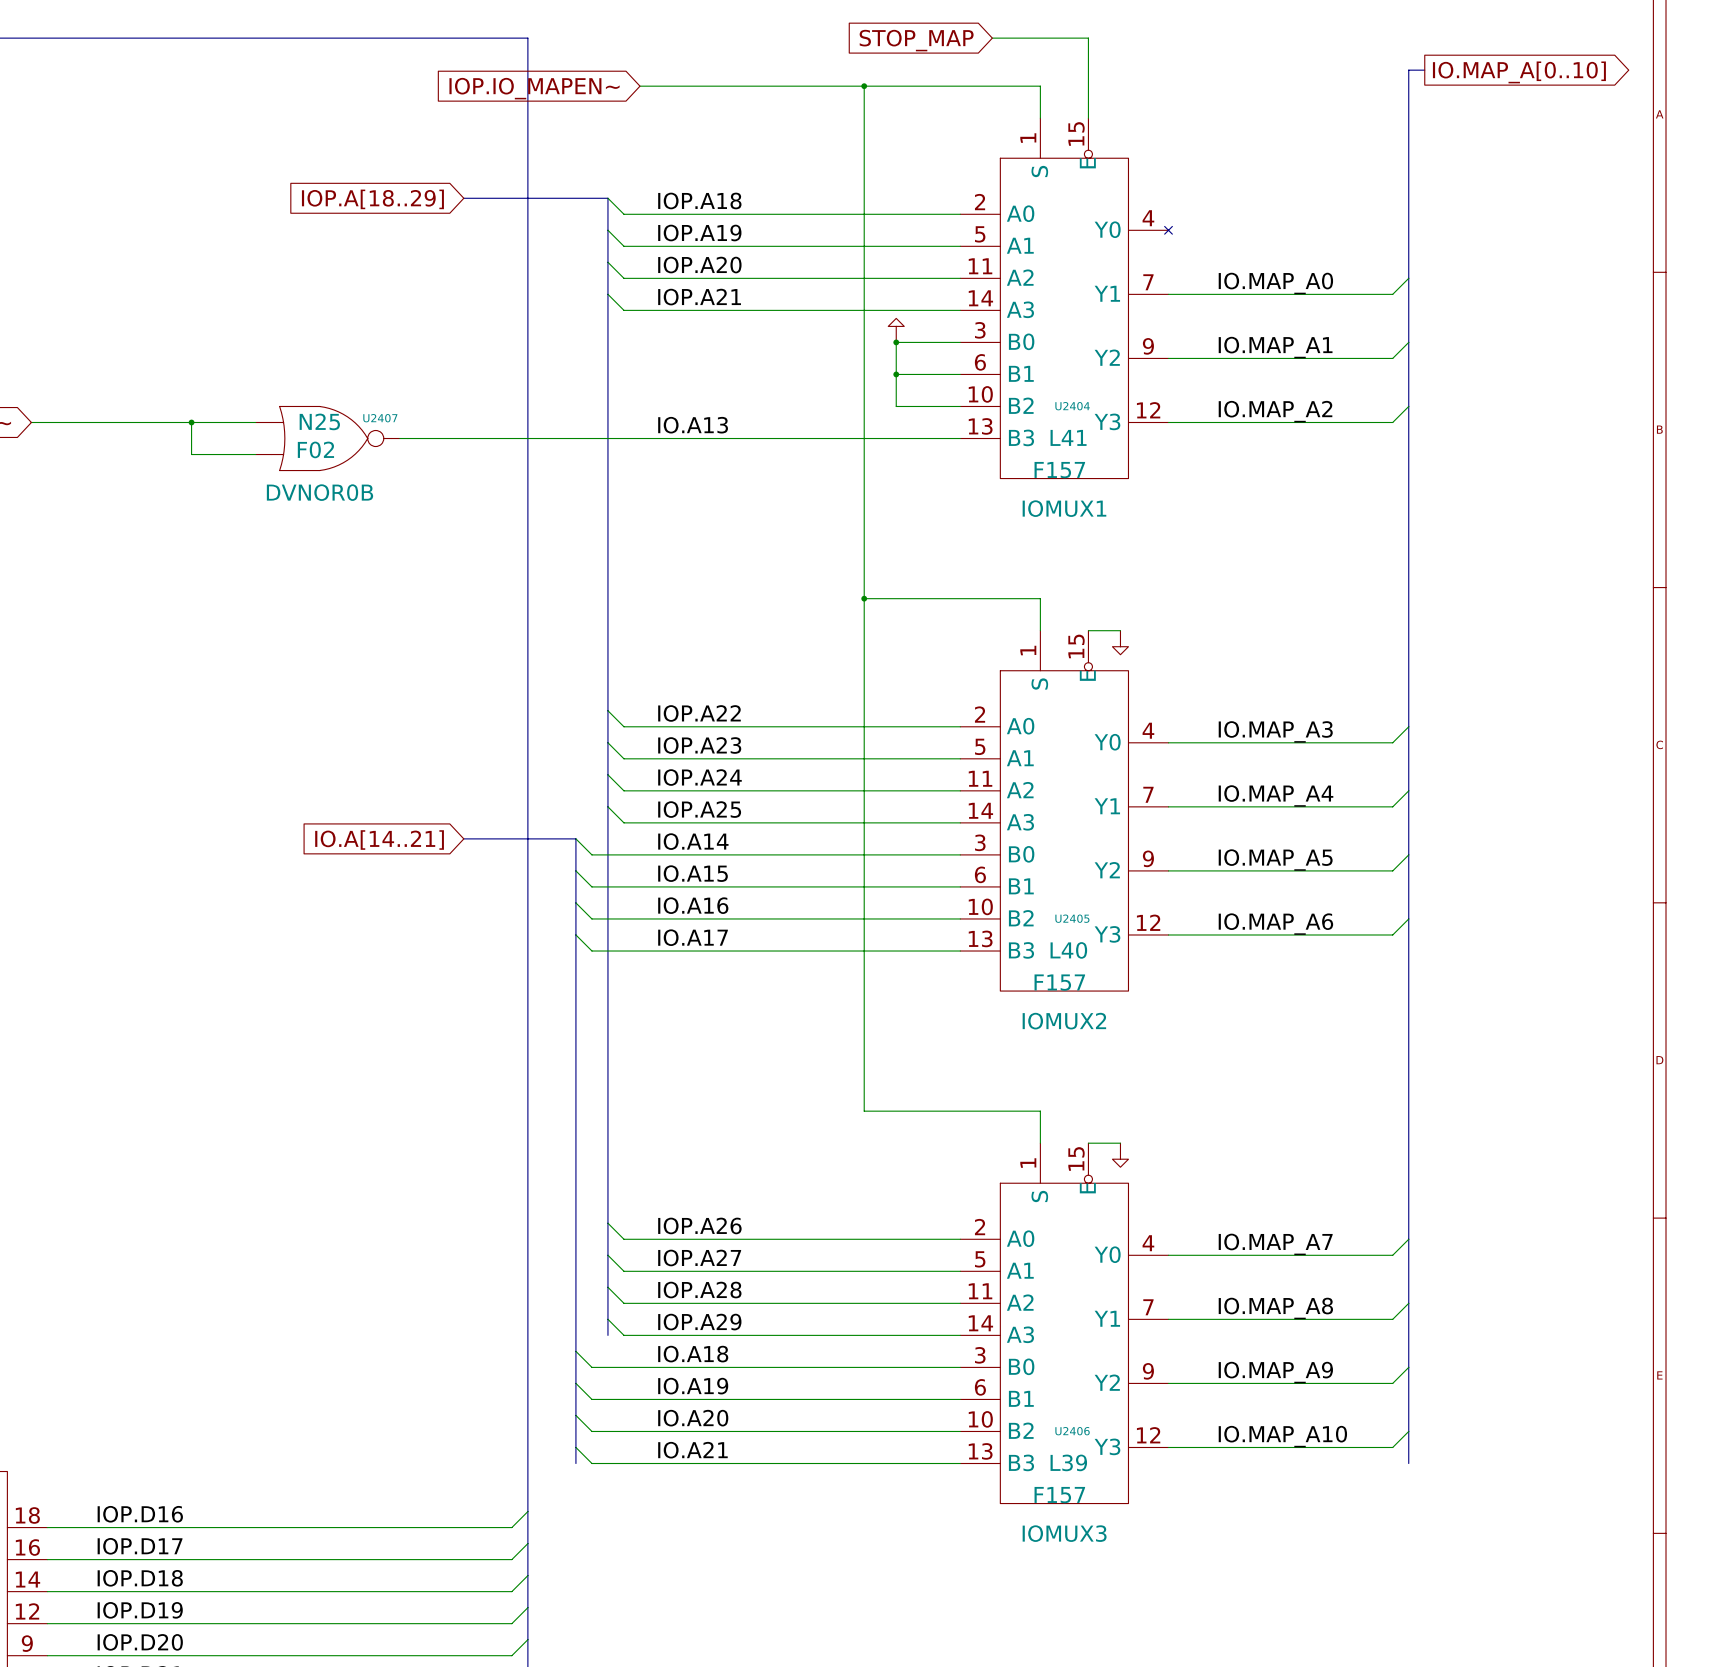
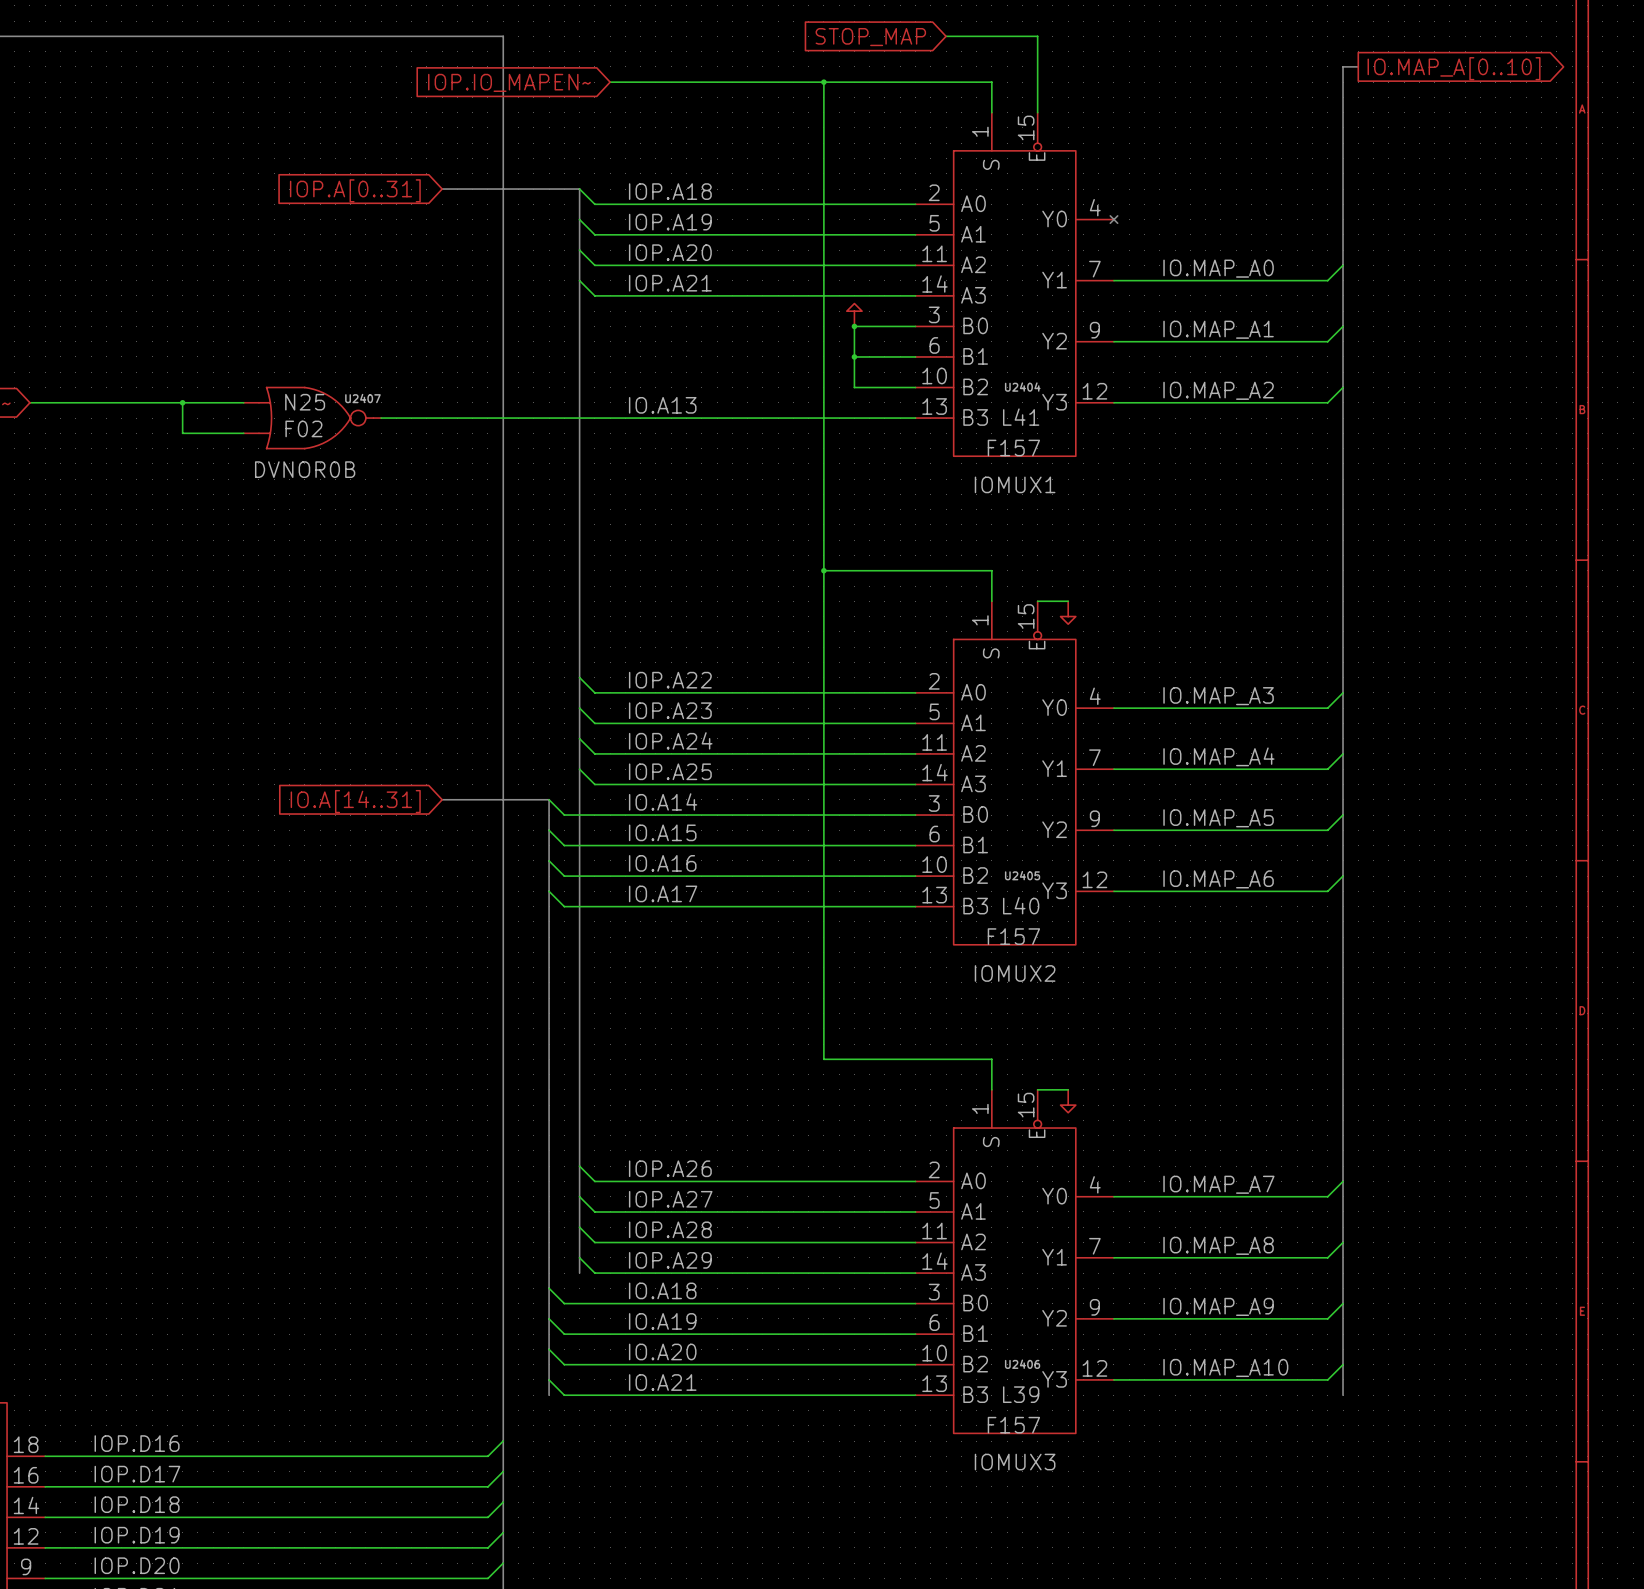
global label: IOP.A[18..29] (372, 199) -> IOP.A[0..31] (355, 190)
global label: IO.A[14..21] (379, 840) -> IO.A[14..31] (355, 801)

